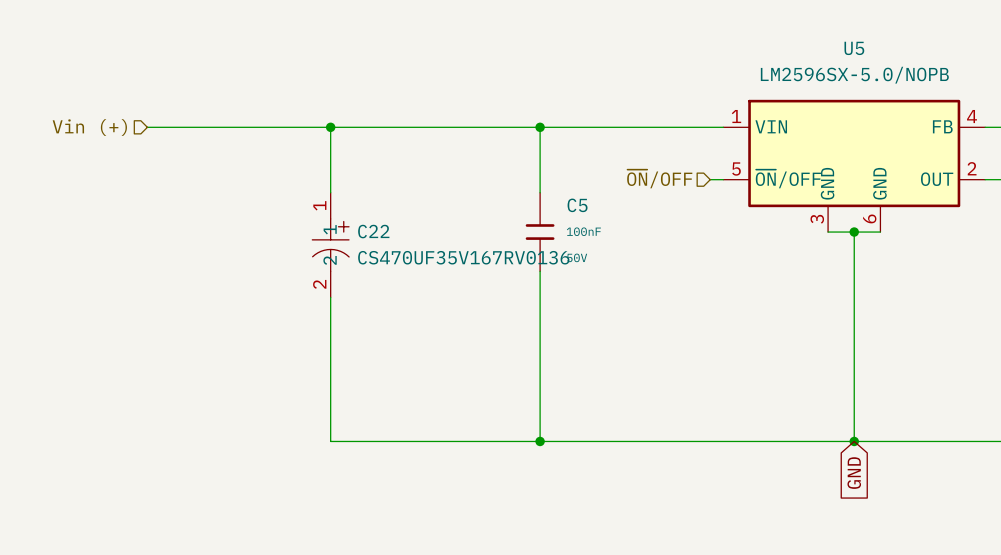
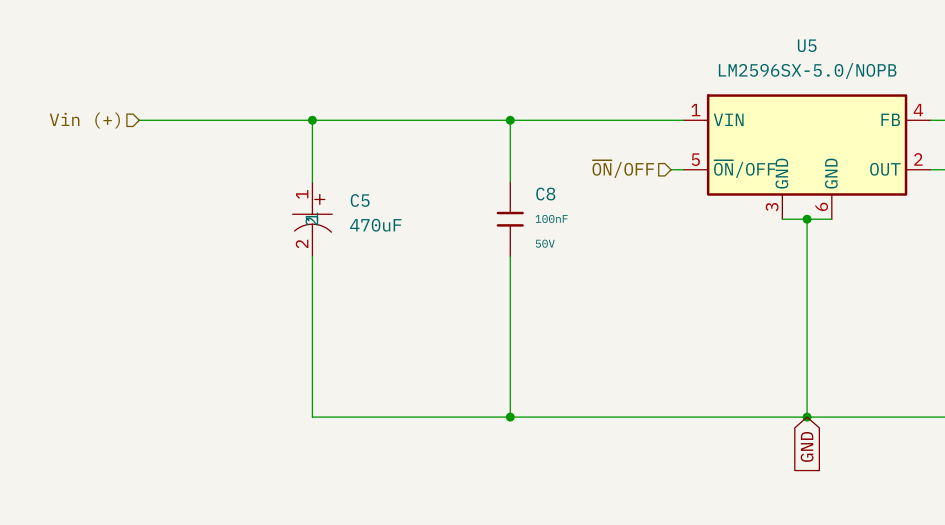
C5 name: C5 (577, 205) -> C8 (545, 194)
C5: none -> 470uF (312, 219)
C22: CS470UF35V167RV0136 (330, 245) -> none

